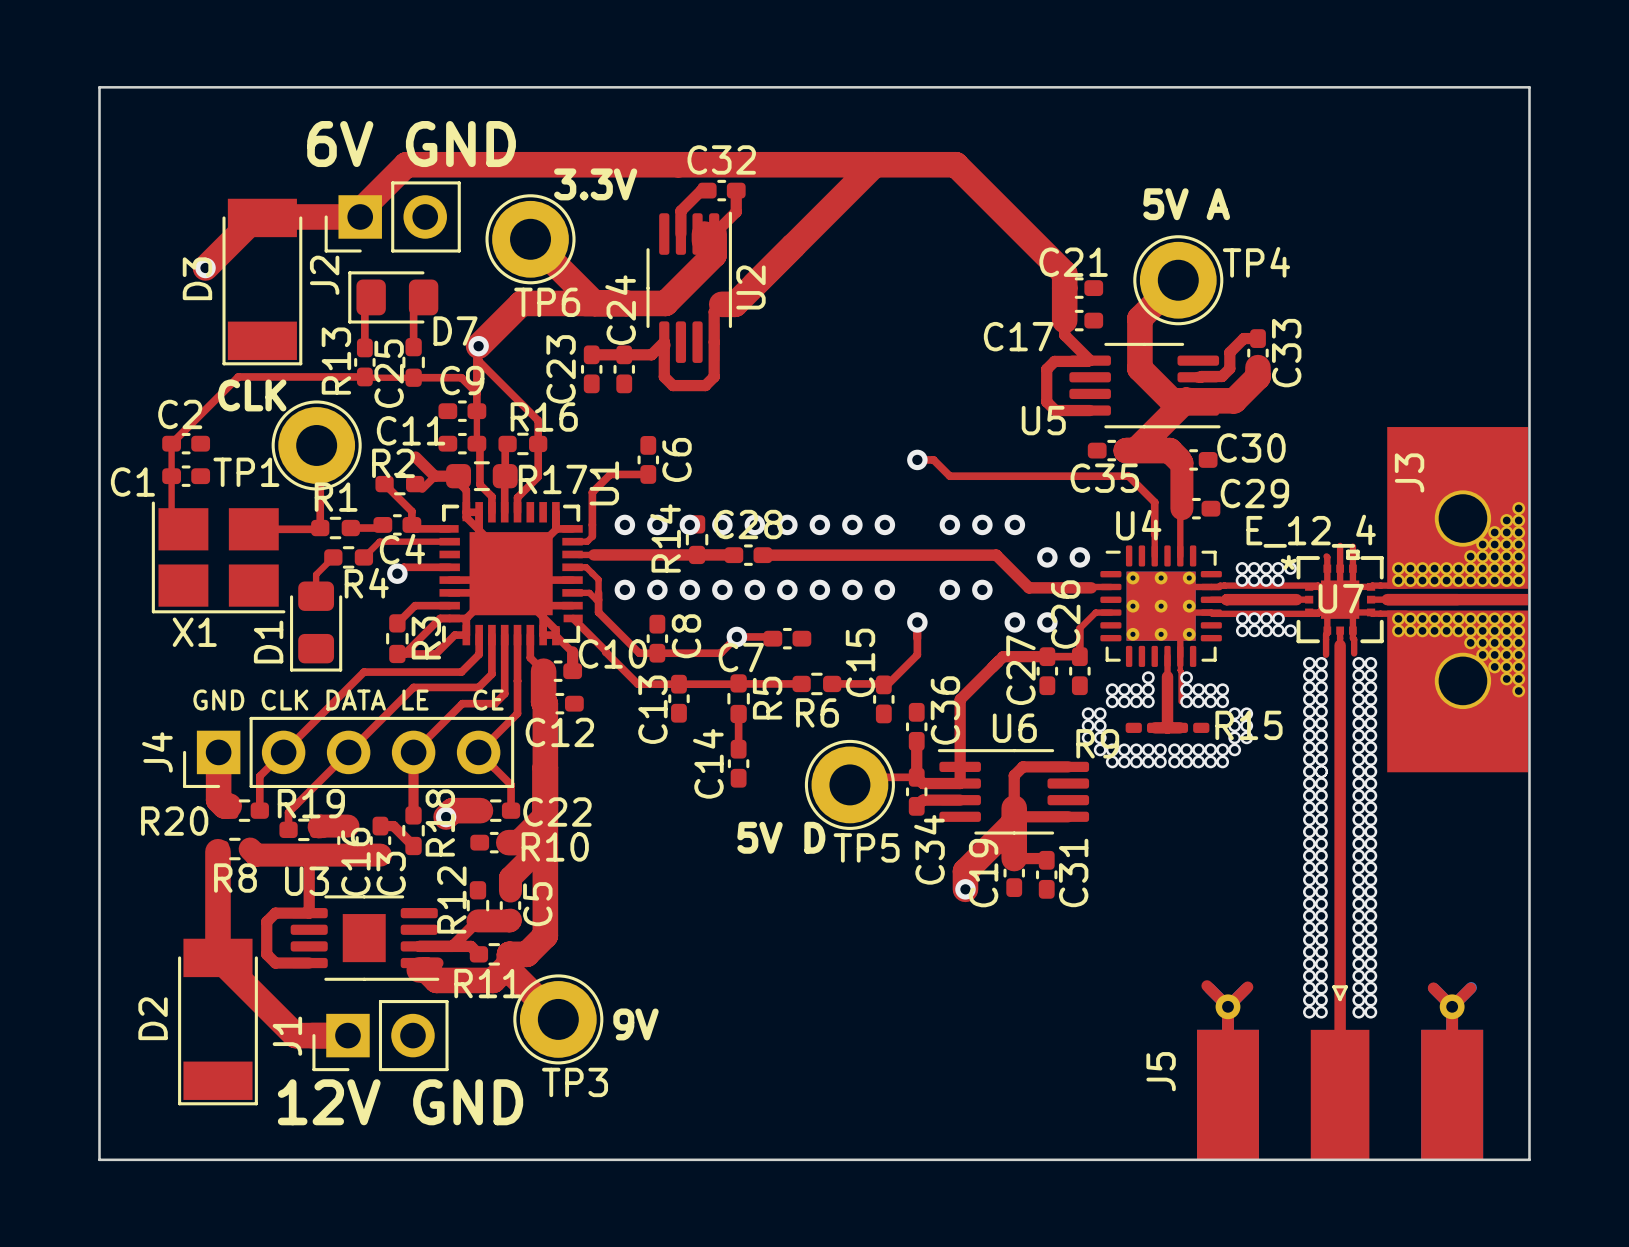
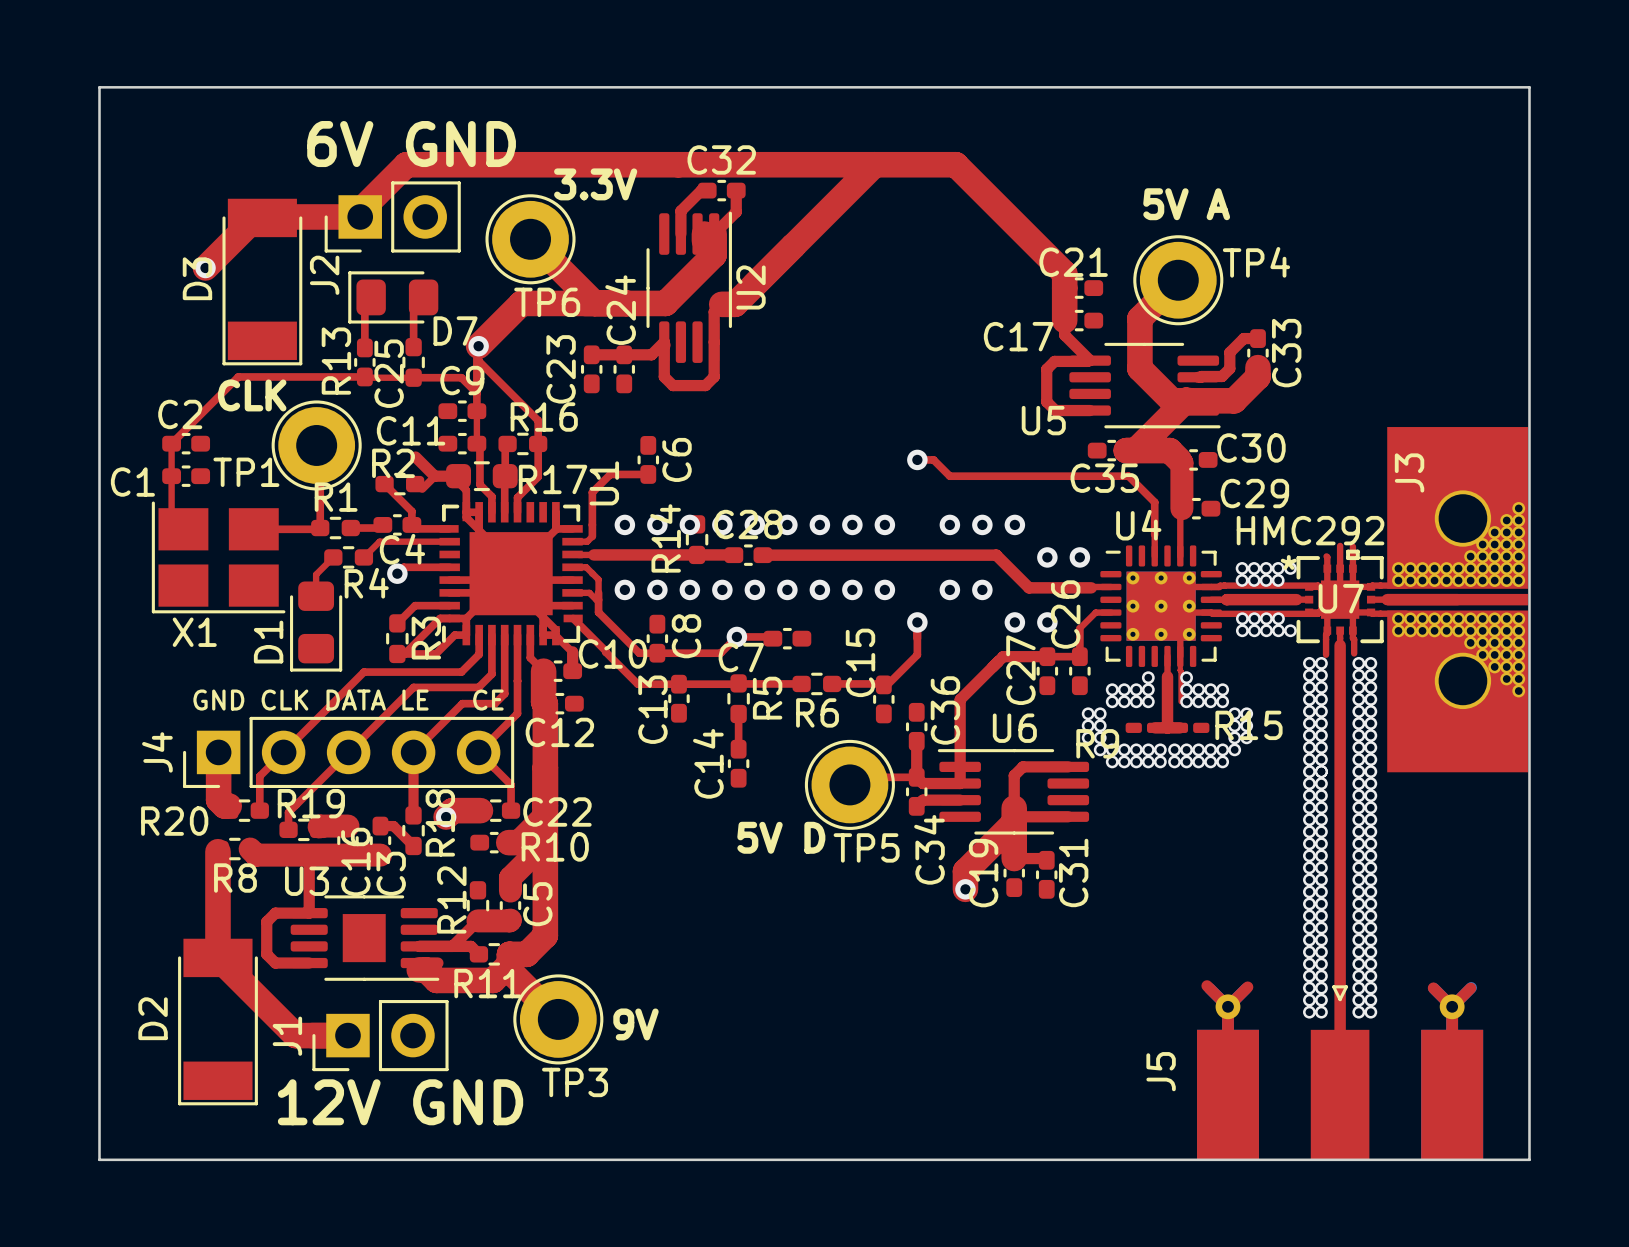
U7 value: E_12_4 (1311, 531) -> HMC292 (1310, 530)

